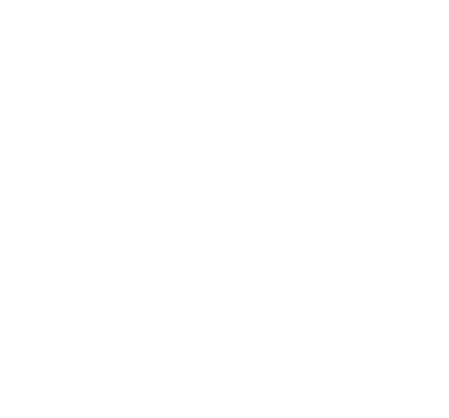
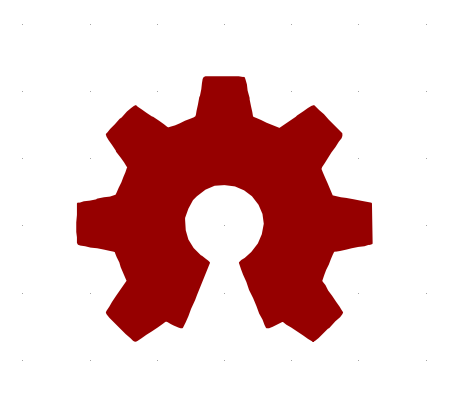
power symbol: none -> (224, 208)

